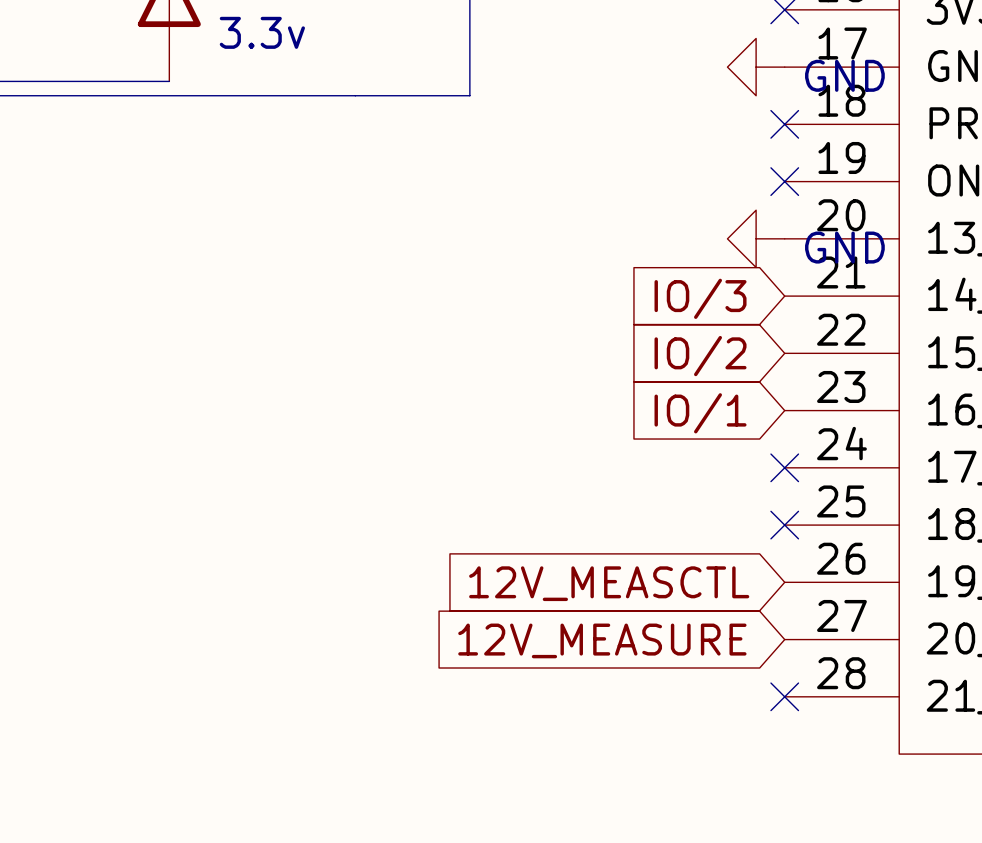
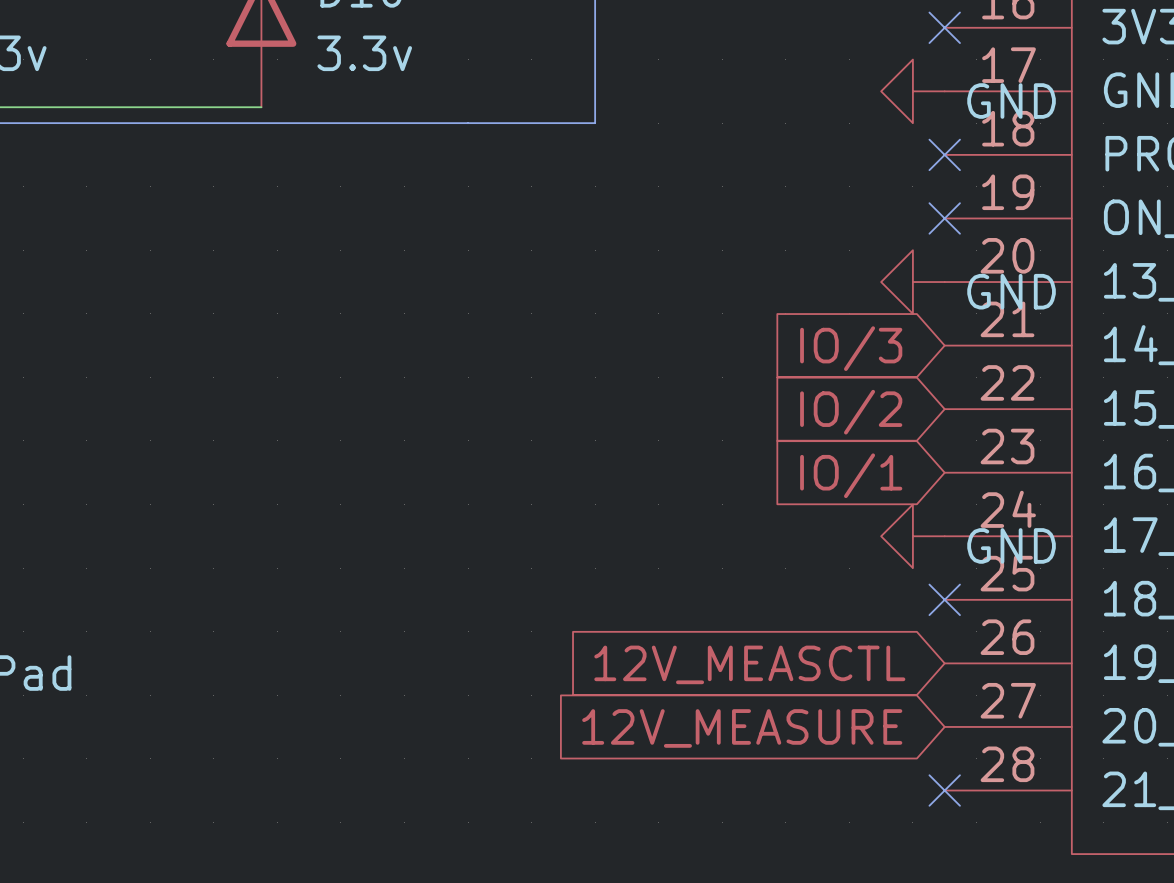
power symbol: none -> GND (912, 536)
no-connect mark: (784, 467) -> none

